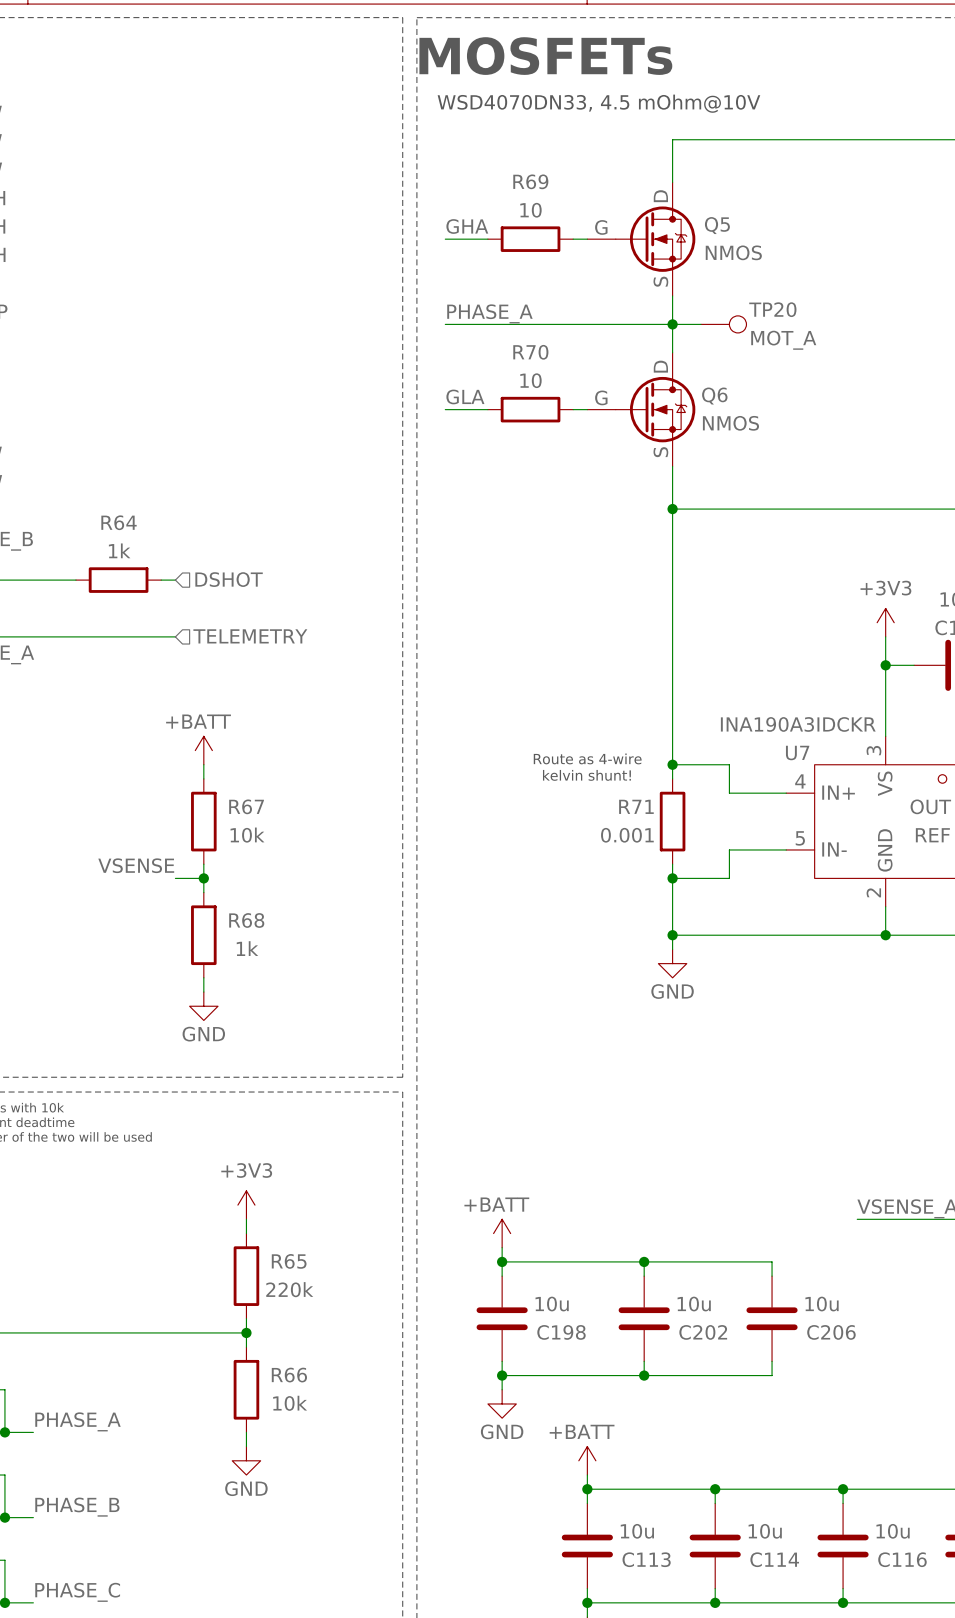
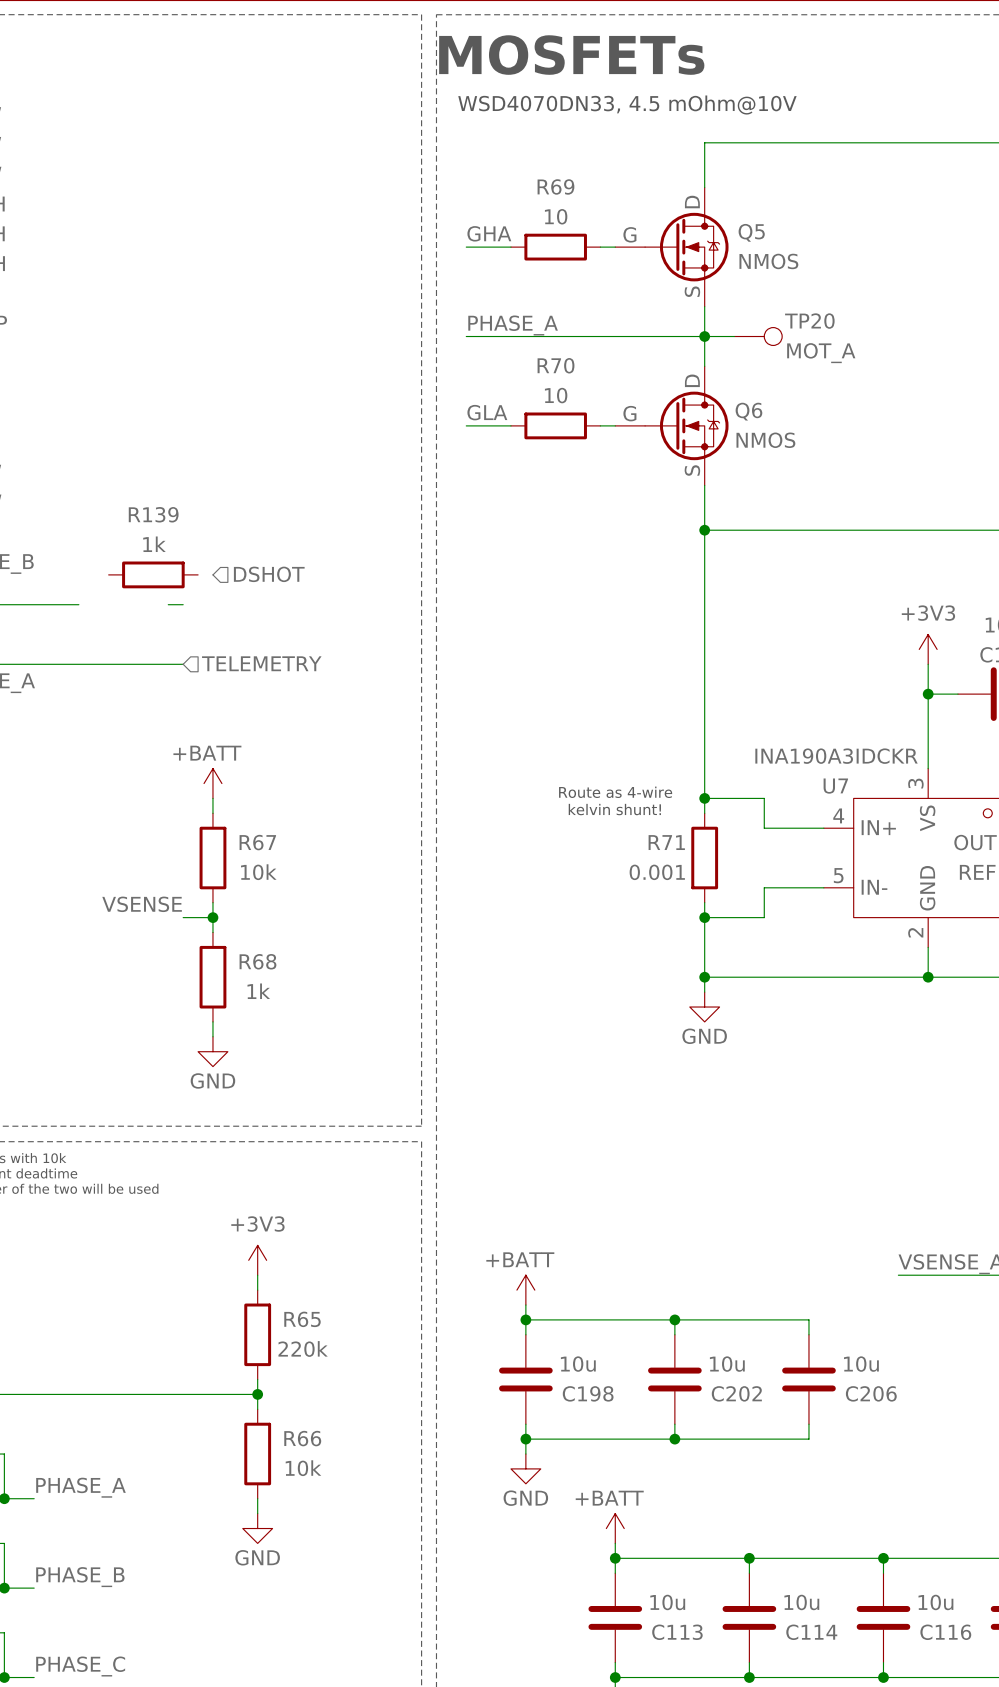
R139: none -> 1k (153, 574)
hierarchical label position: DSHOT (229, 579) -> DSHOT (269, 574)
R64: 1k (118, 580) -> none

